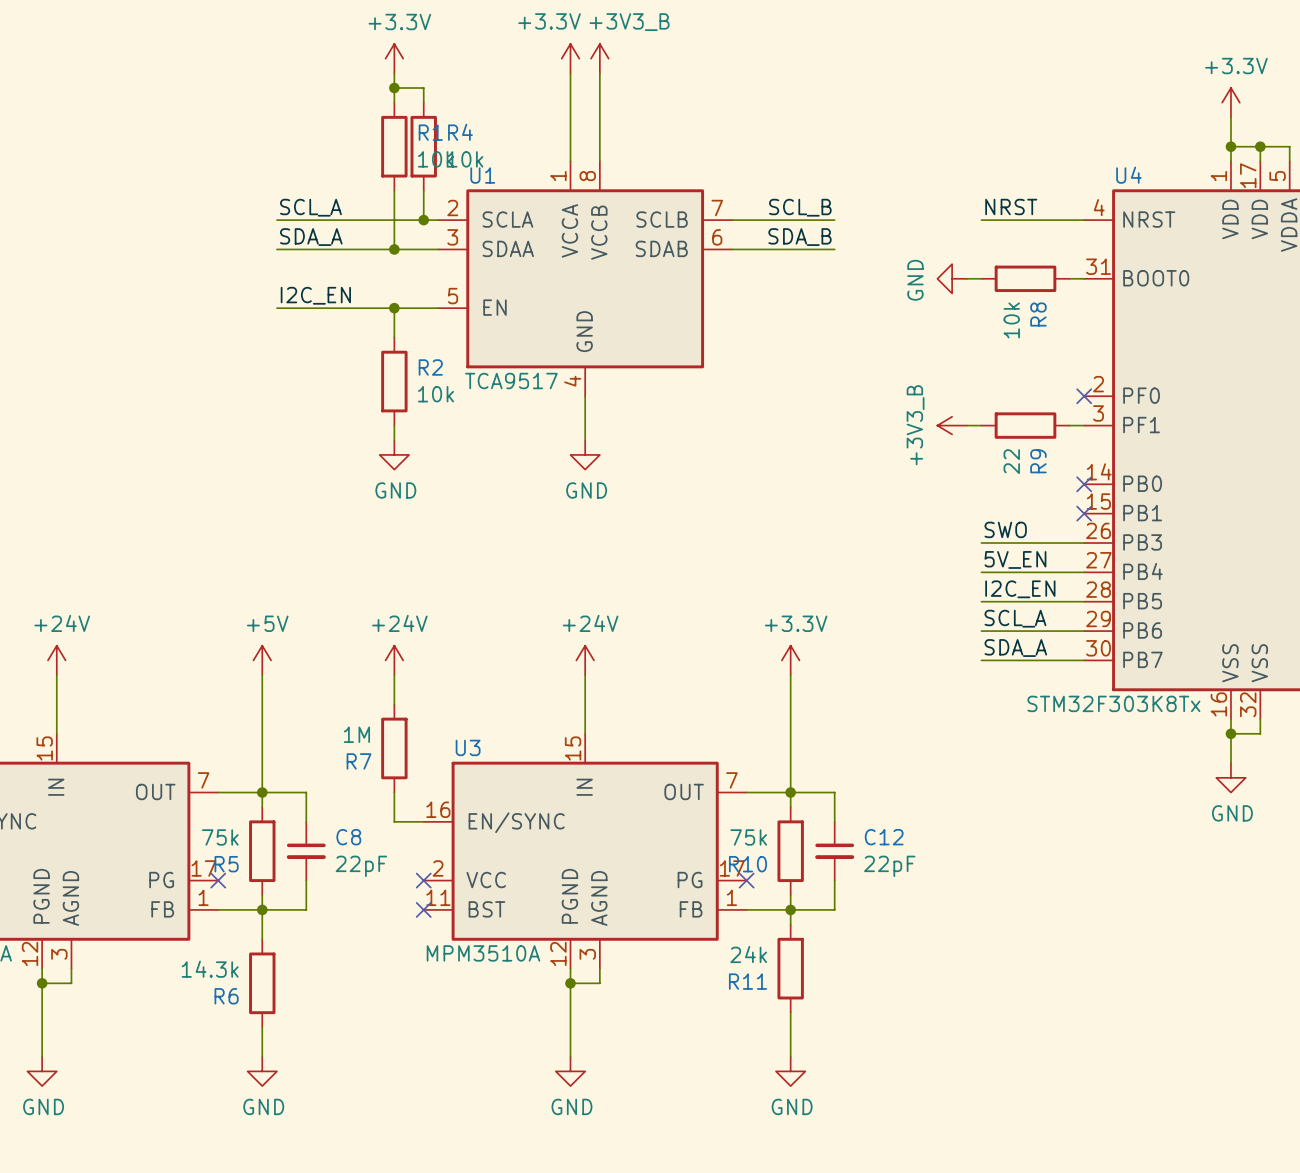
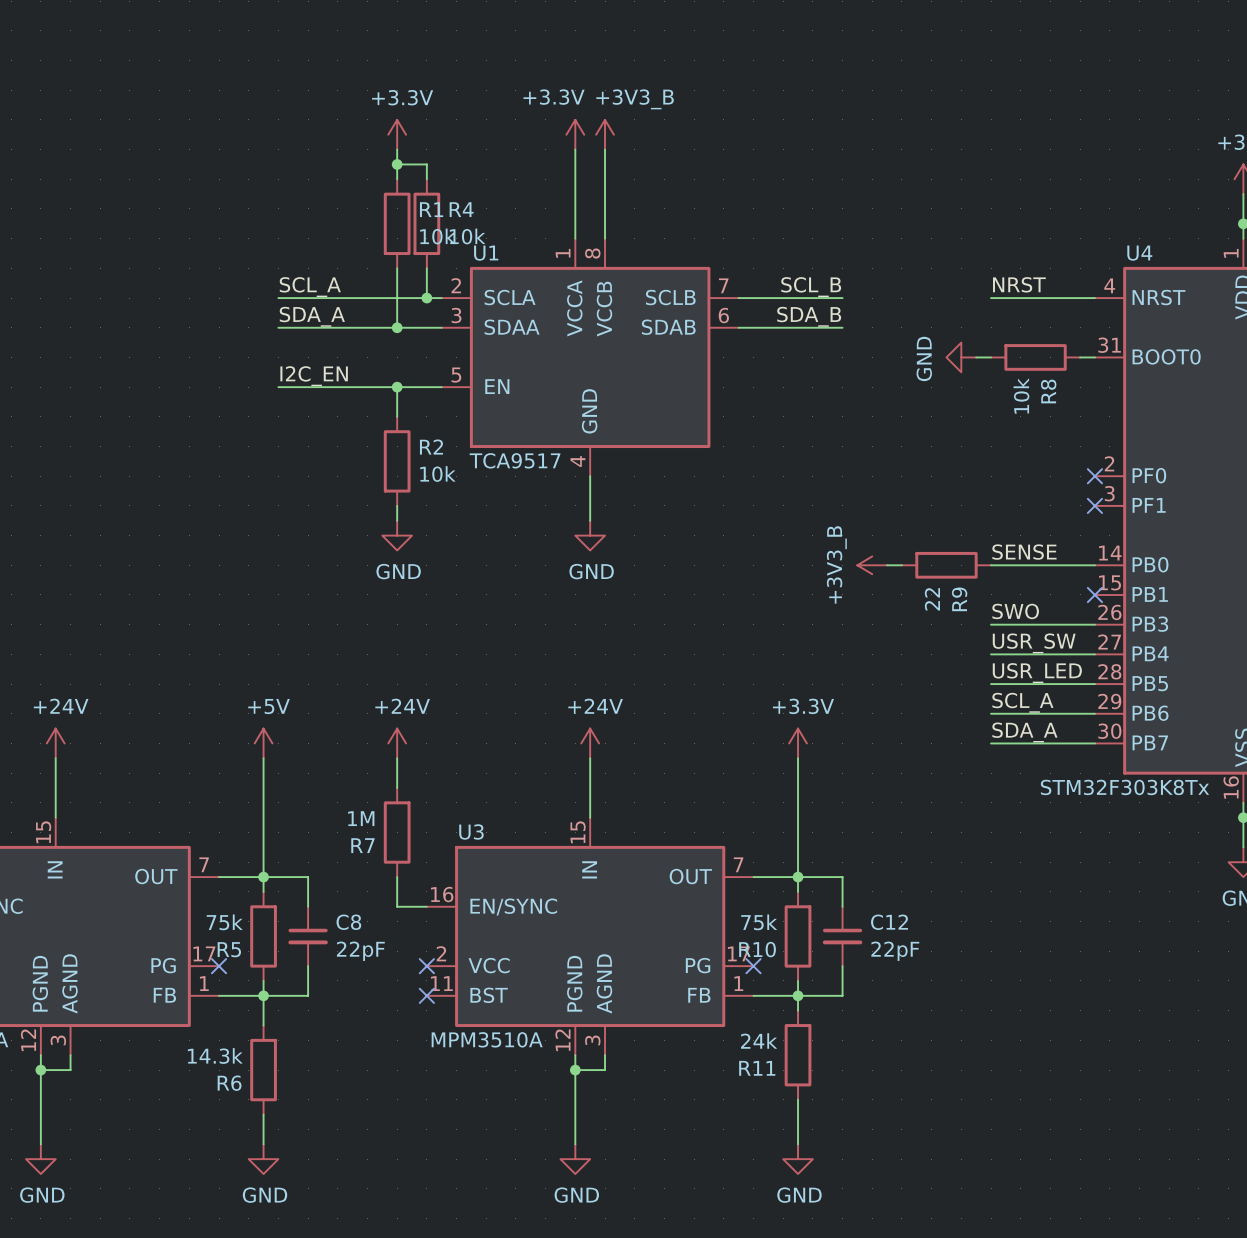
power symbol position: +3V3_B (952, 425) -> +3V3_B (872, 565)
wire: (966, 425) (981, 425) -> (887, 565) (901, 565)
R9 position: (1025, 425) -> (946, 565)
wire: (1069, 425) (1084, 425) -> none
label: none -> SENSE (1024, 552)
wire: none -> (991, 565) (1094, 565)
no-connect mark position: (1084, 484) -> (1094, 505)
label: 5V_EN (1015, 559) -> USR_SW (1034, 643)
label: I2C_EN (1020, 589) -> USR_LED (1037, 673)

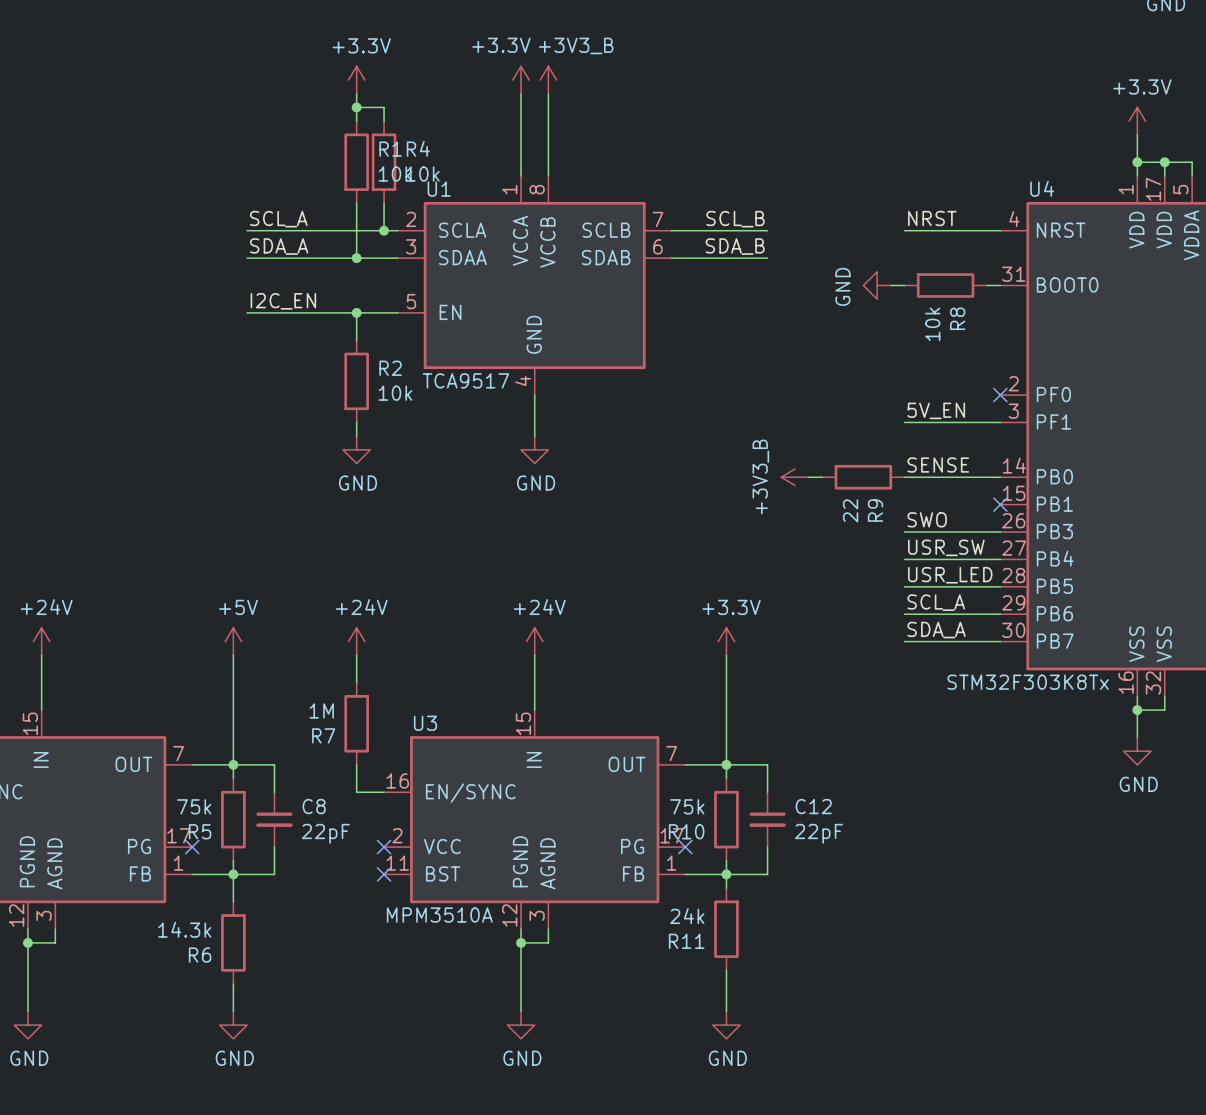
label: none -> 5V_EN (936, 410)
wire: none -> (904, 422) (1000, 422)
no-connect mark: (1094, 505) -> none

